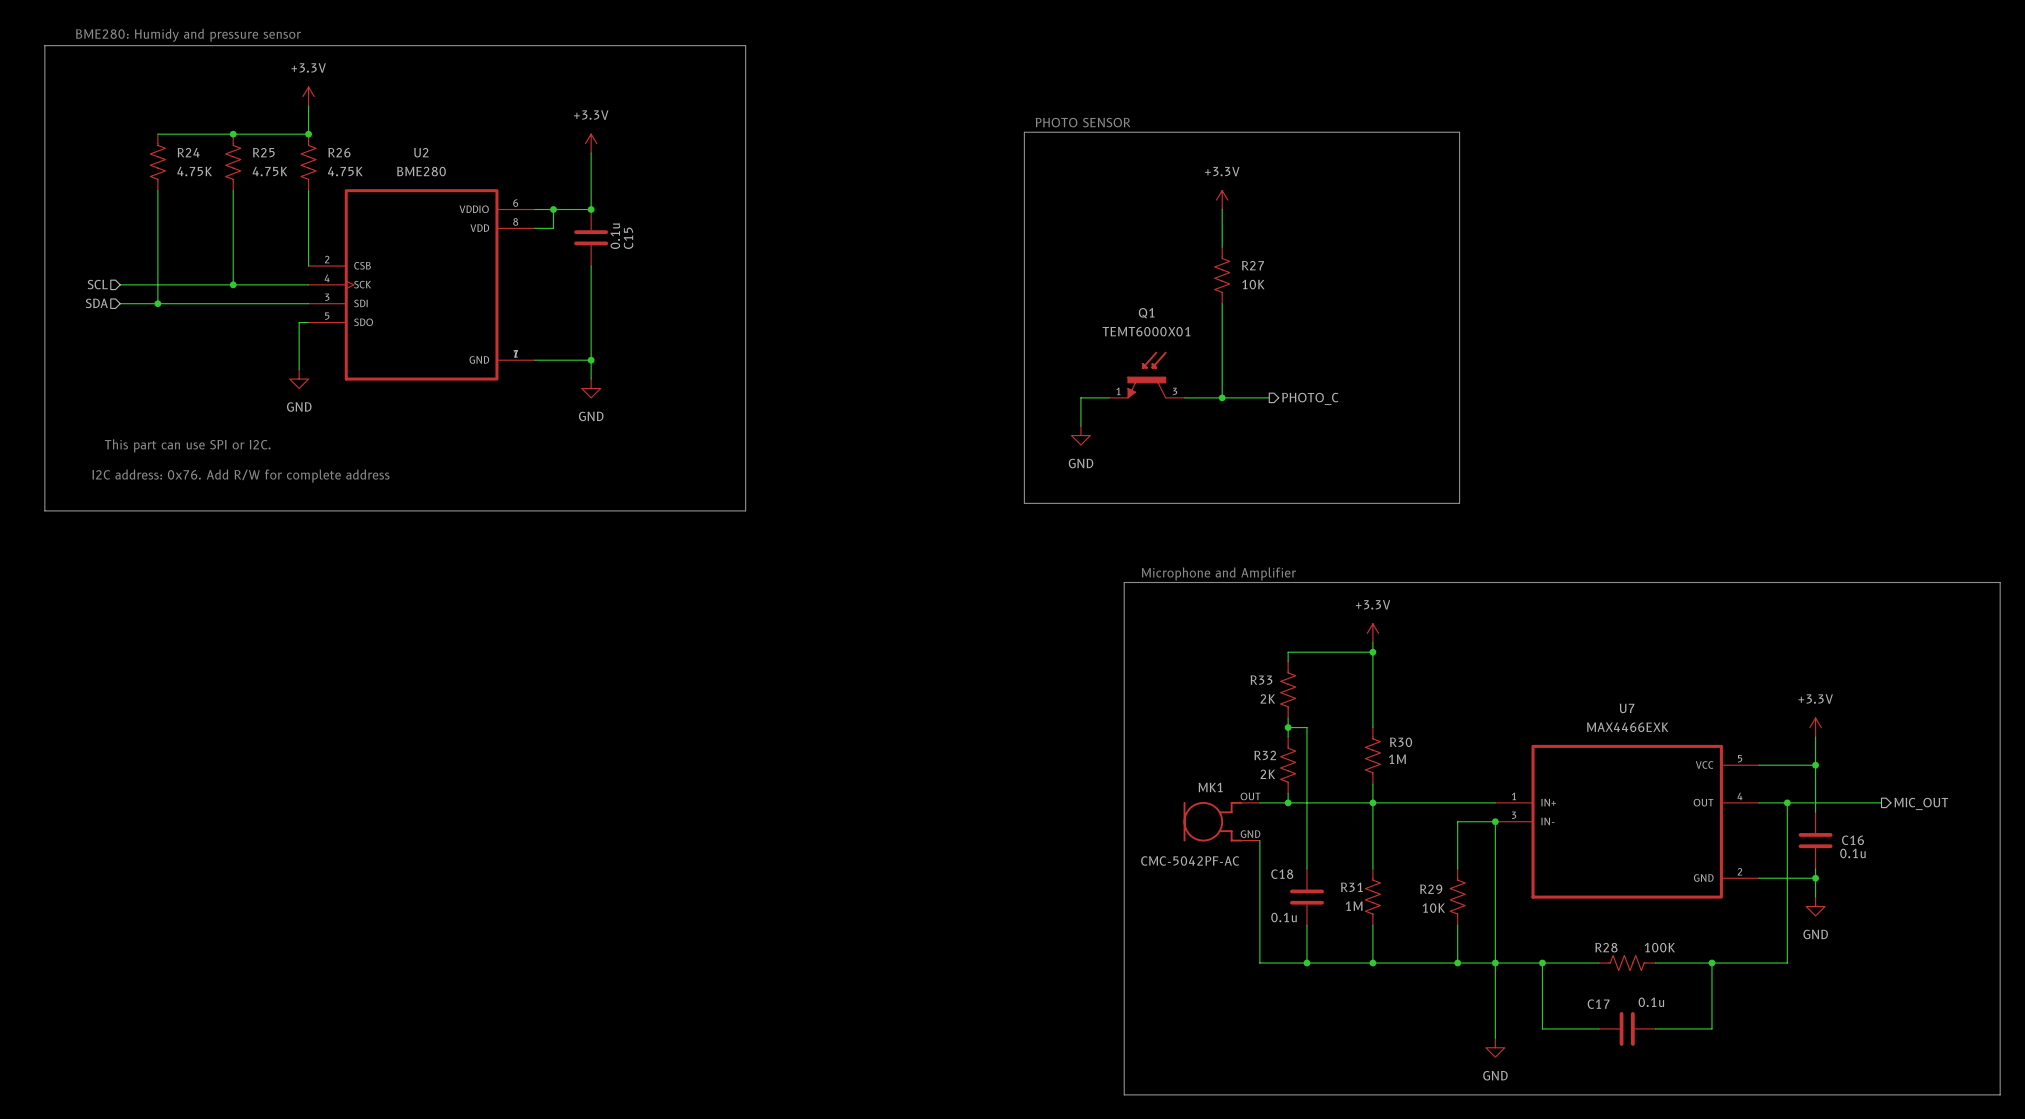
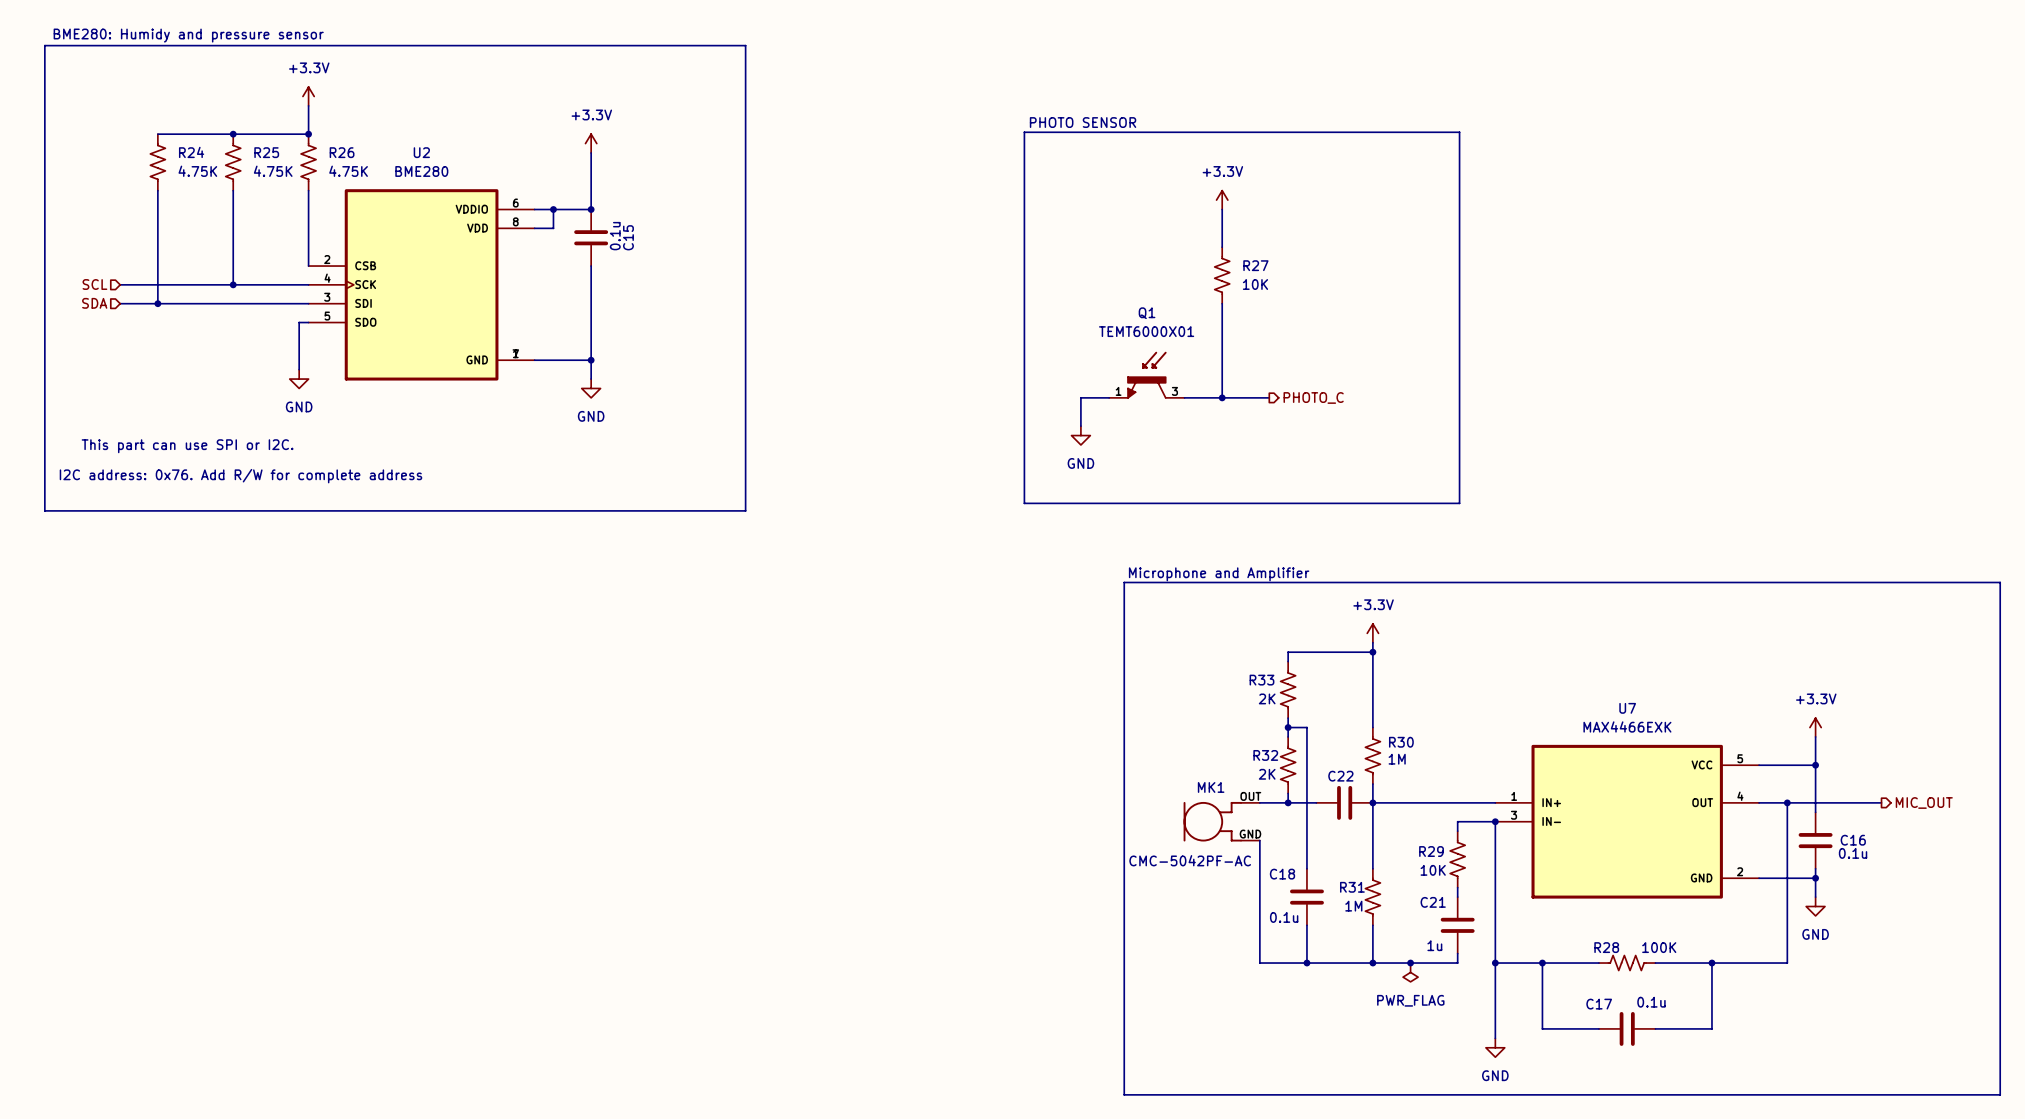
C22: none -> (1344, 802)
wire: (1457, 831) (1457, 868) -> none
wire: none -> (1457, 887) (1457, 897)
R29 position: (1457, 897) -> (1457, 859)
C21: none -> 1u (1457, 925)
junction: none -> (1410, 963)
wire: (1457, 963) (1495, 963) -> none
junction: (1457, 963) -> none
power symbol: none -> PWR_FLAG (1410, 972)

